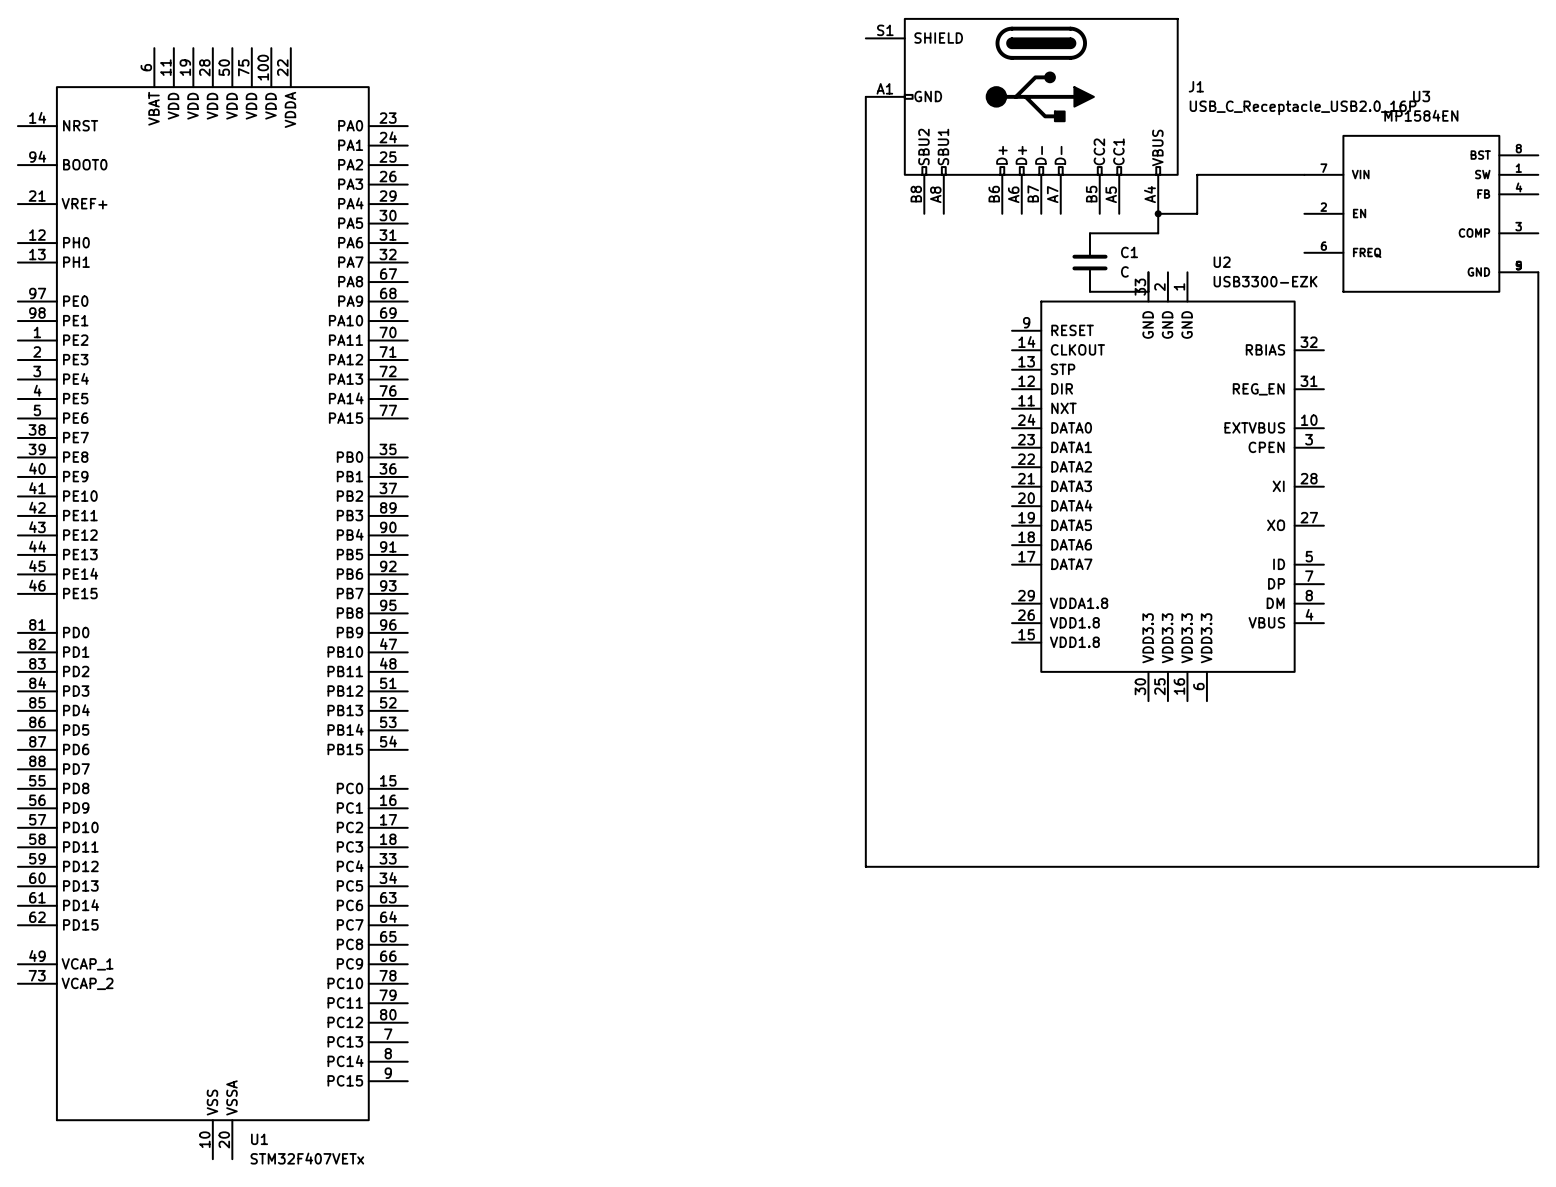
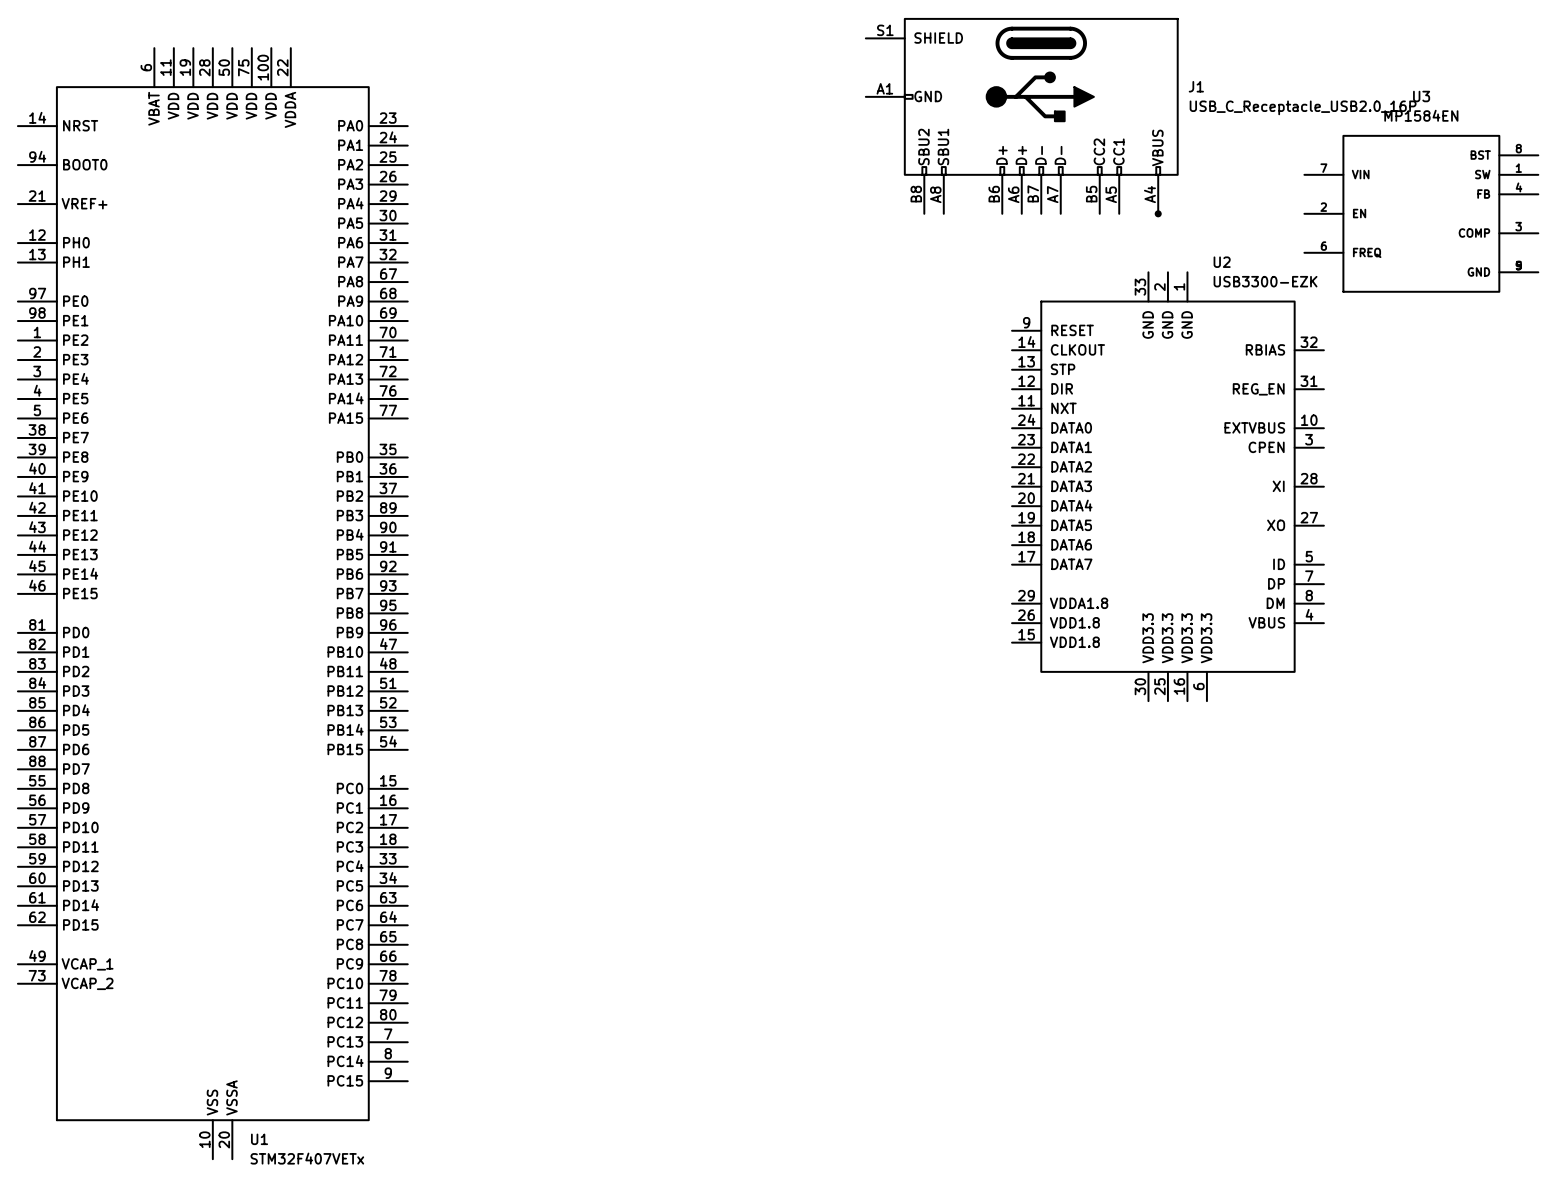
wire: (865, 96) (865, 866) (1538, 866) (1538, 272) -> none
wire: (1304, 174) (1197, 174) (1197, 213) (1158, 213) (1158, 233) (1089, 233) -> none
C1: C (1089, 262) -> none
wire: (1148, 272) (1148, 291) (1089, 291) -> none

